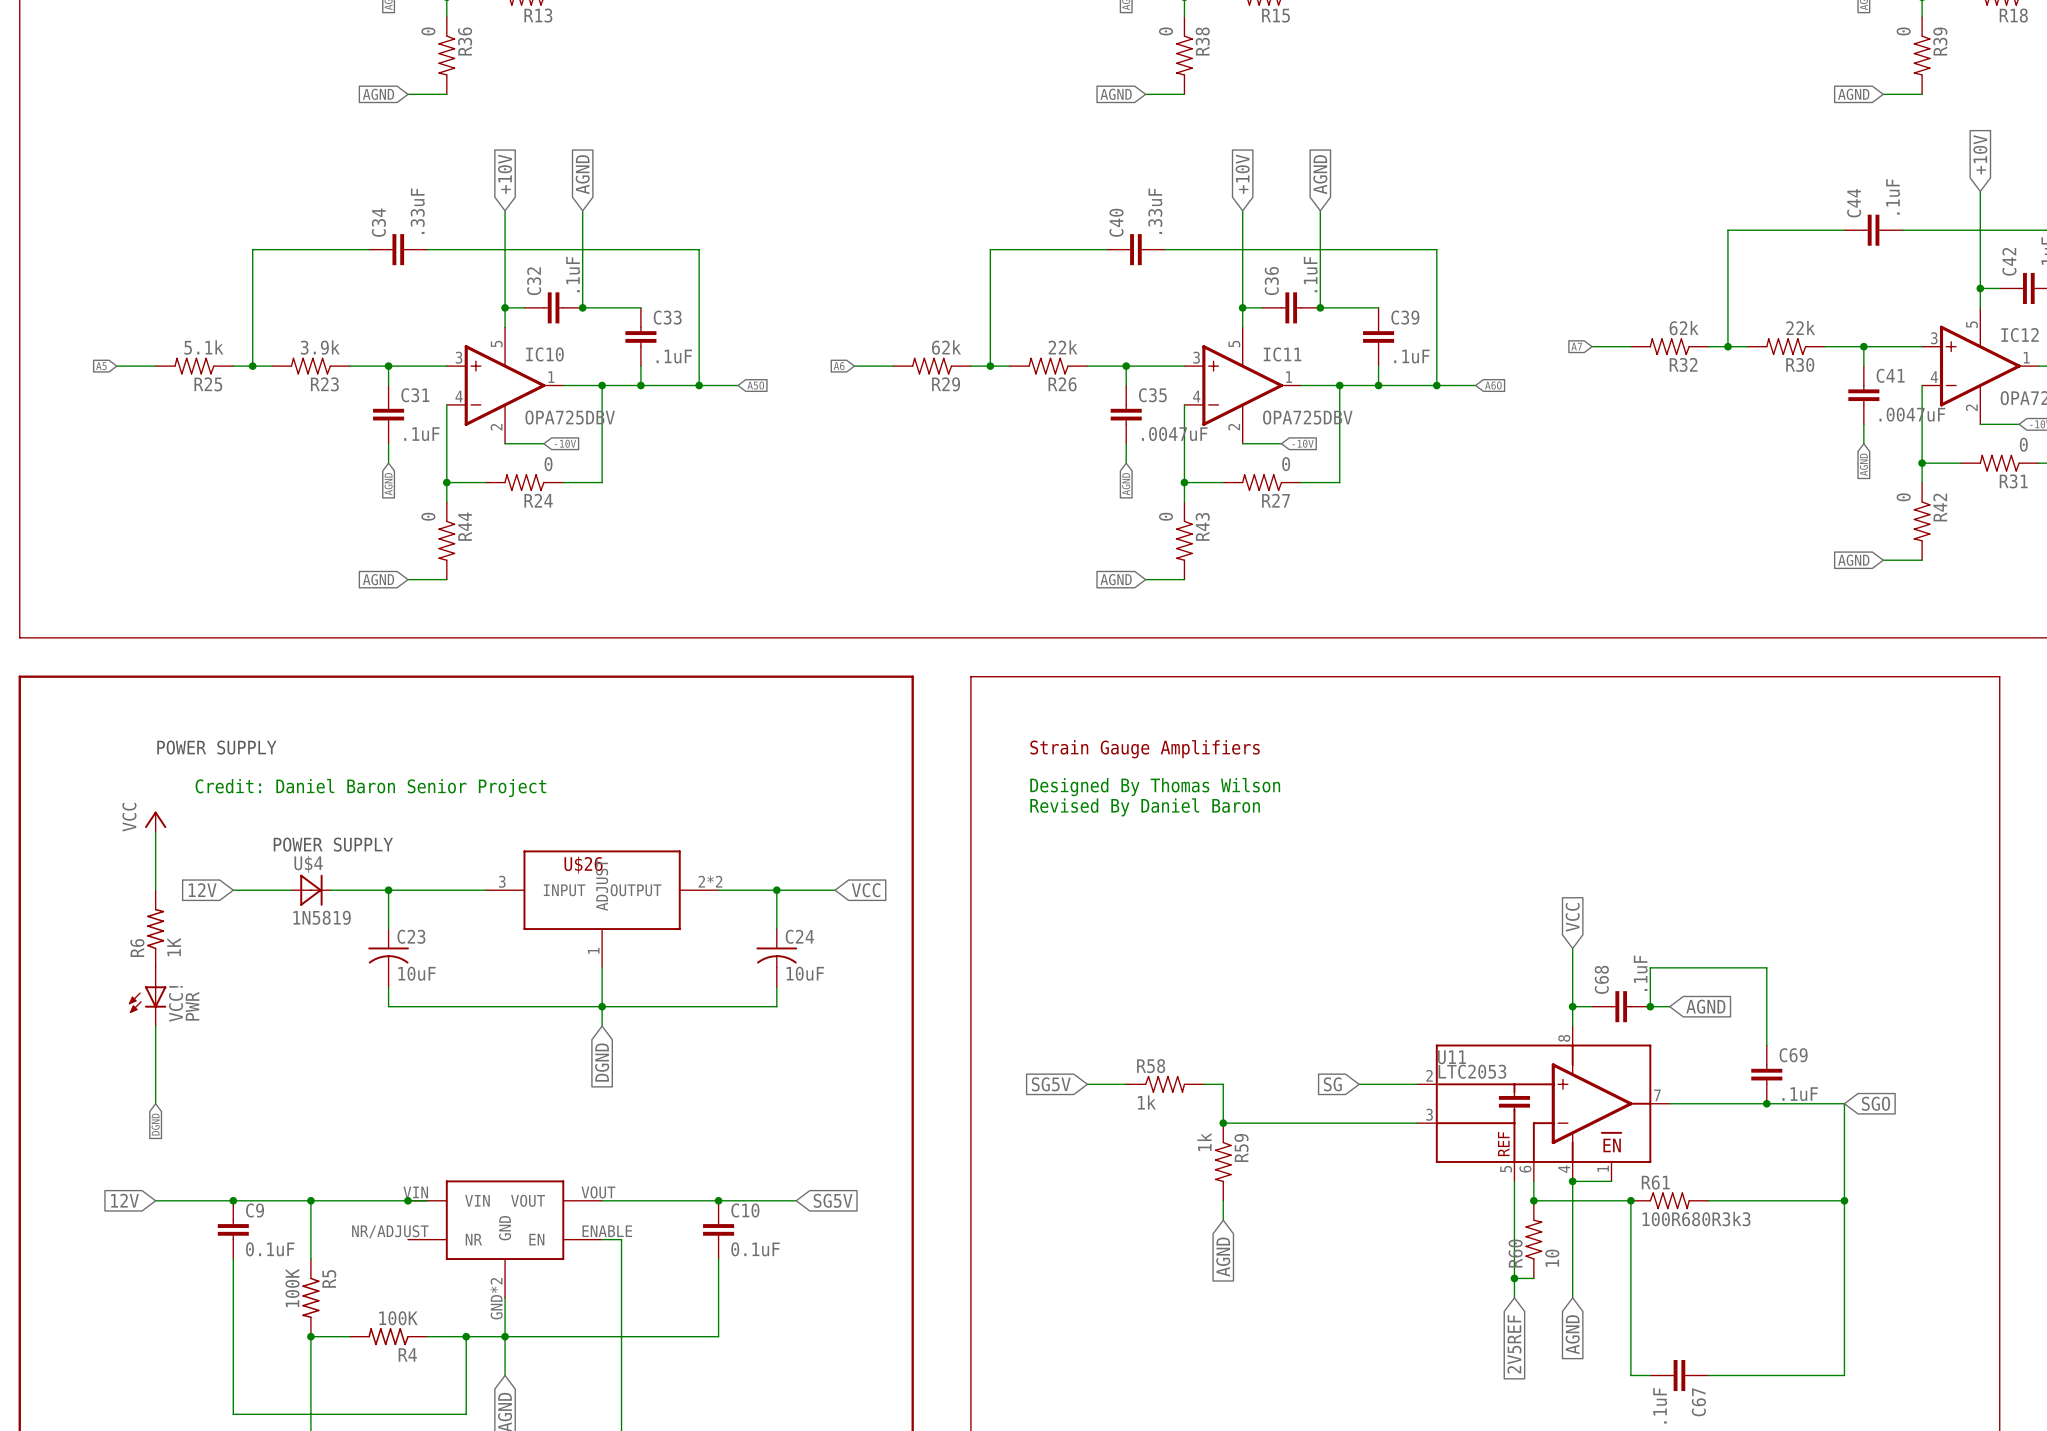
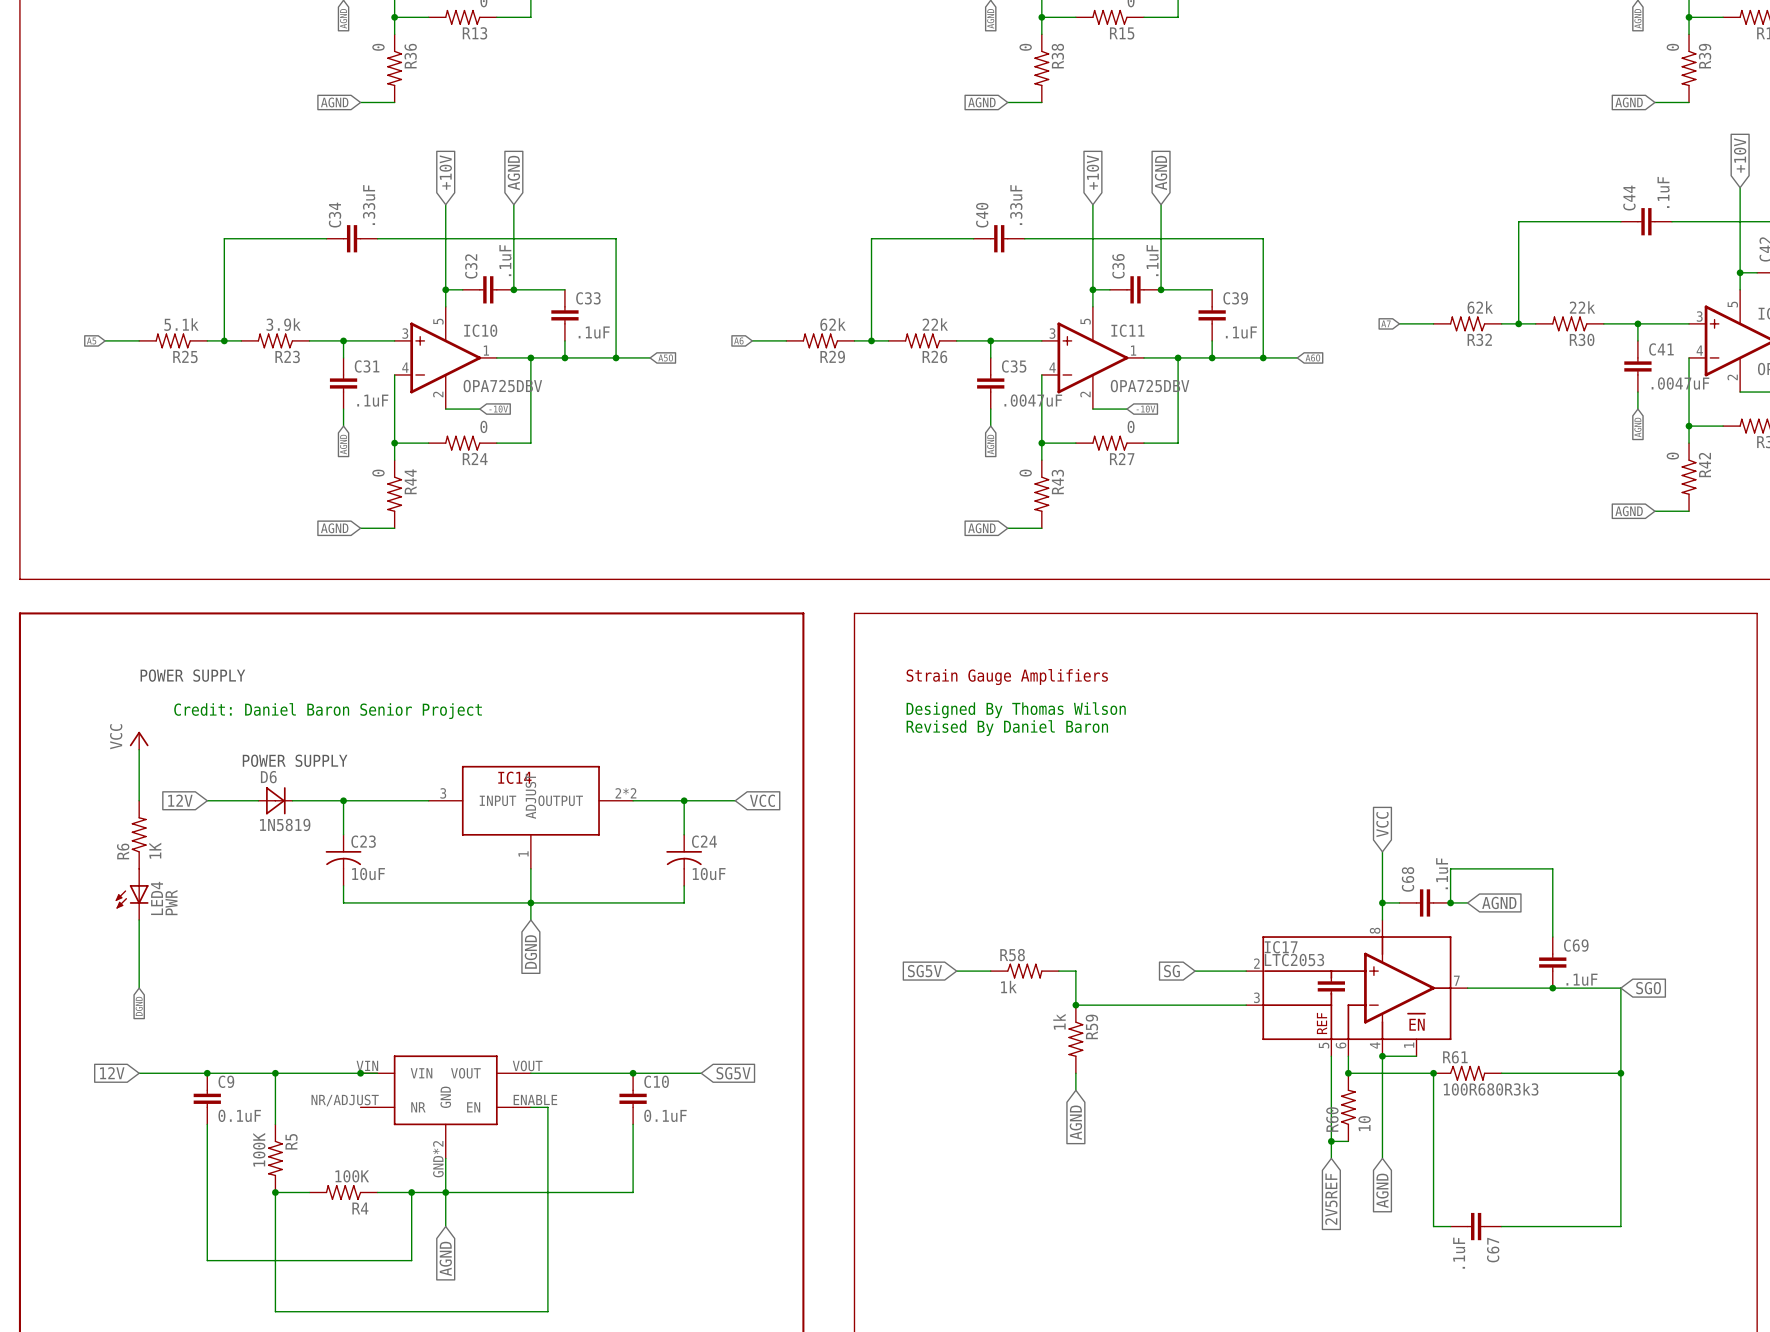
U$4 name: U$4 (308, 864) -> D6 (268, 777)
U$26 name: U$26 (583, 865) -> IC14 (514, 777)
VCC! name: VCC! (176, 1003) -> LED4 (157, 898)
U11 name: U11 (1451, 1057) -> IC17 (1281, 947)

